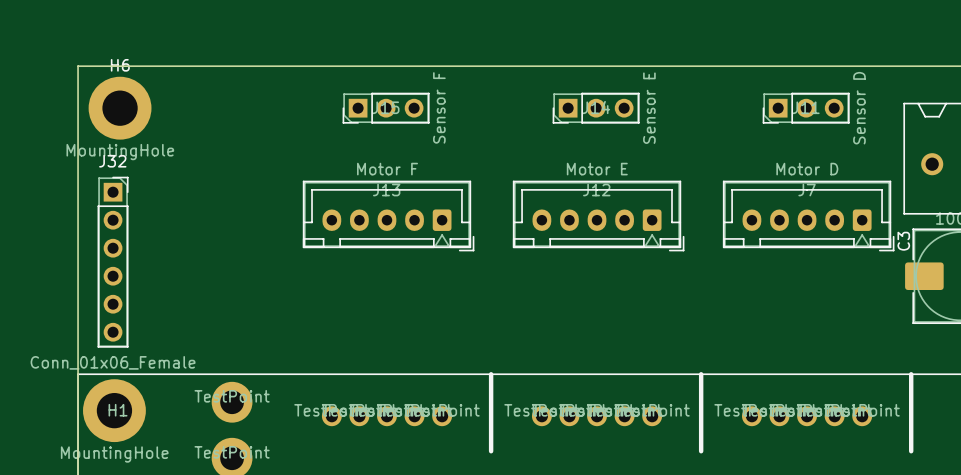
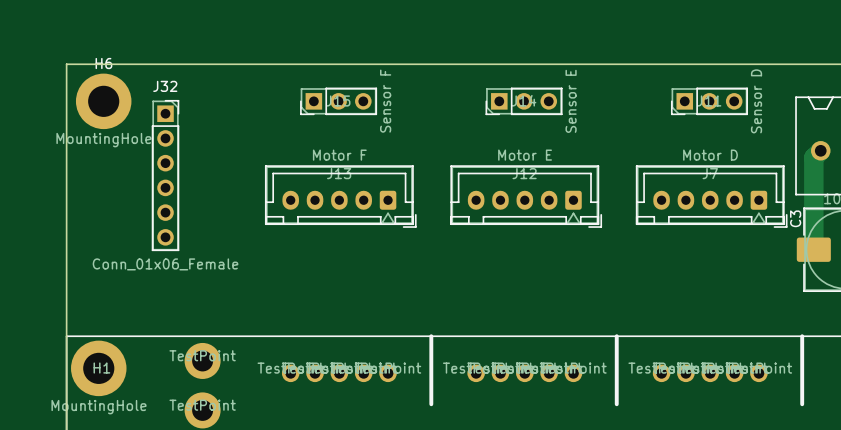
track: none -> (820, 150) (813, 157) (813, 249)
J32 position: (113, 262) -> (165, 175)

